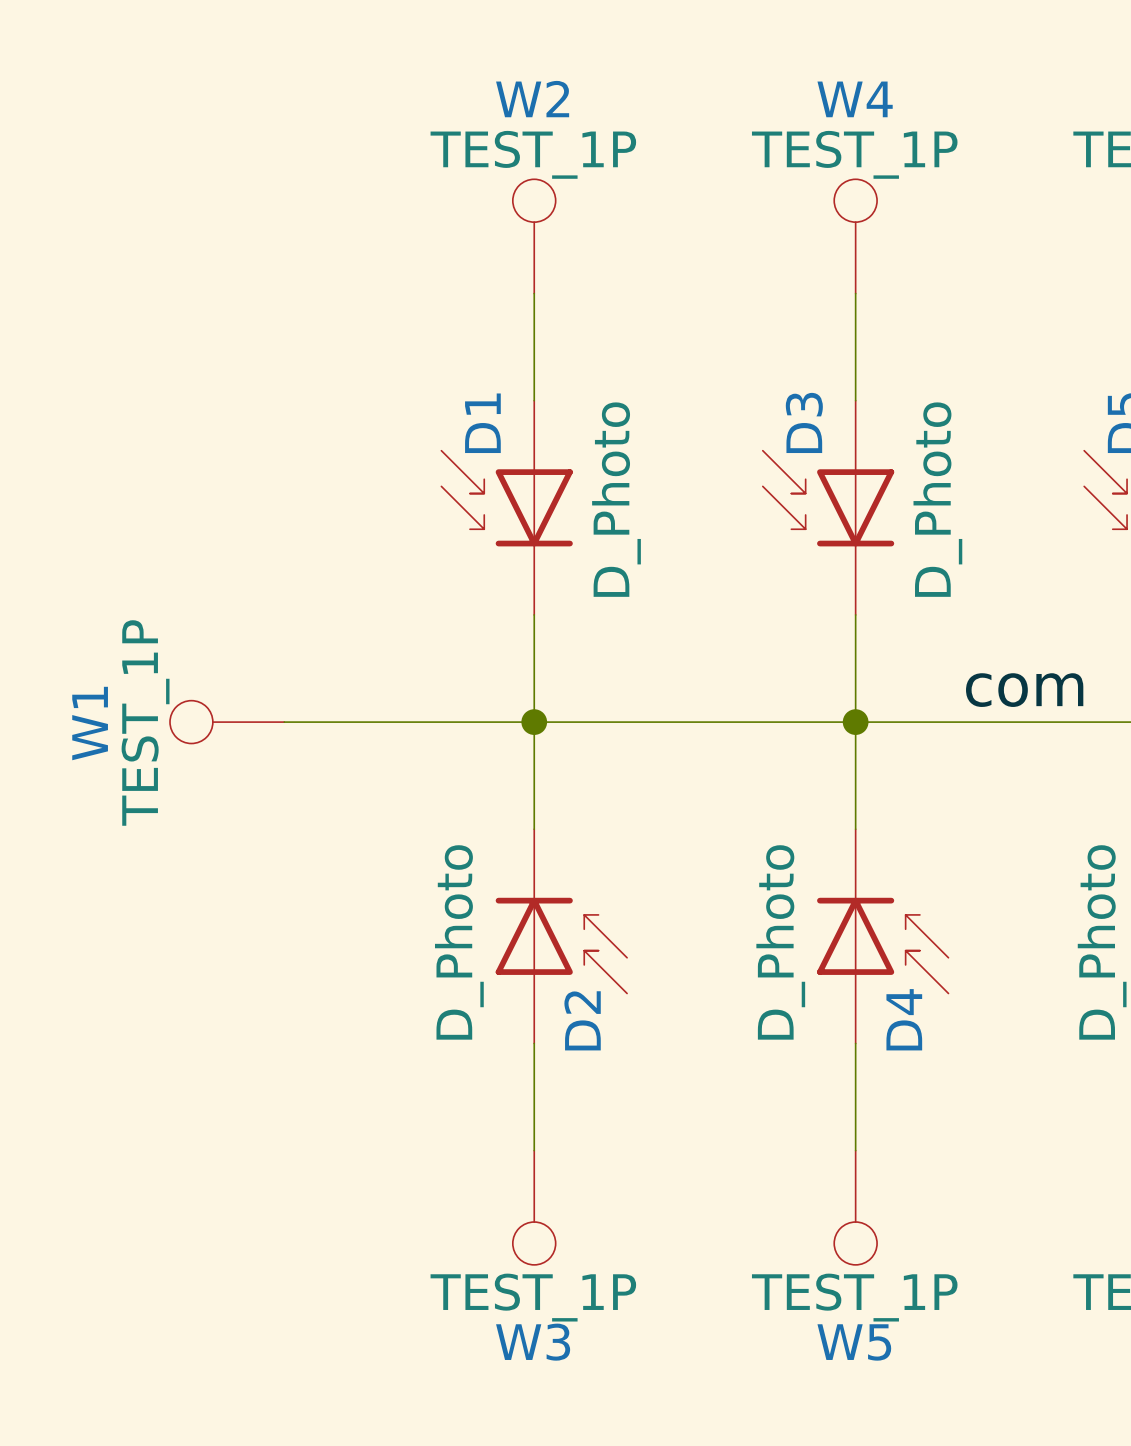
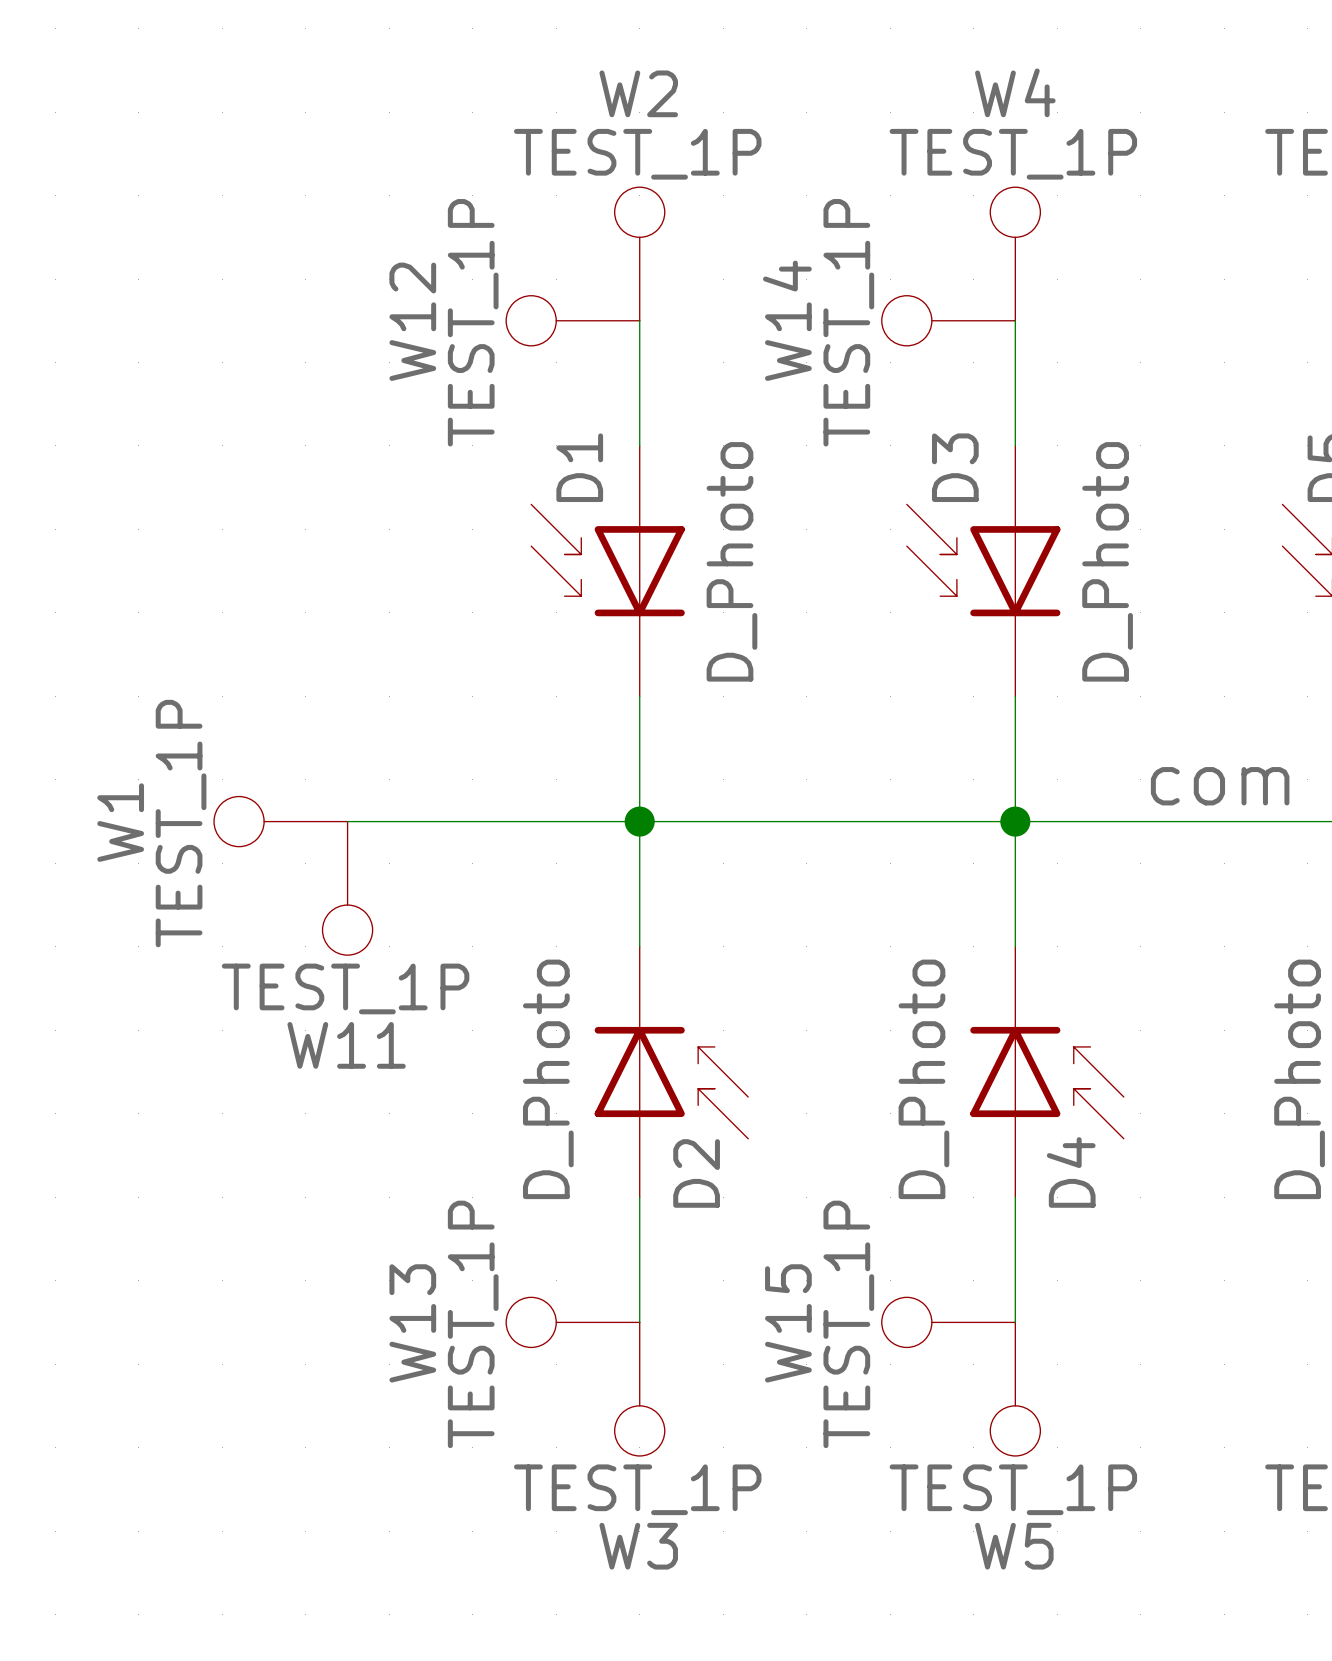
W12: none -> TEST_1P (572, 320)
W14: none -> TEST_1P (948, 320)
W11: none -> TEST_1P (347, 888)
W13: none -> TEST_1P (572, 1322)
W15: none -> TEST_1P (948, 1322)

